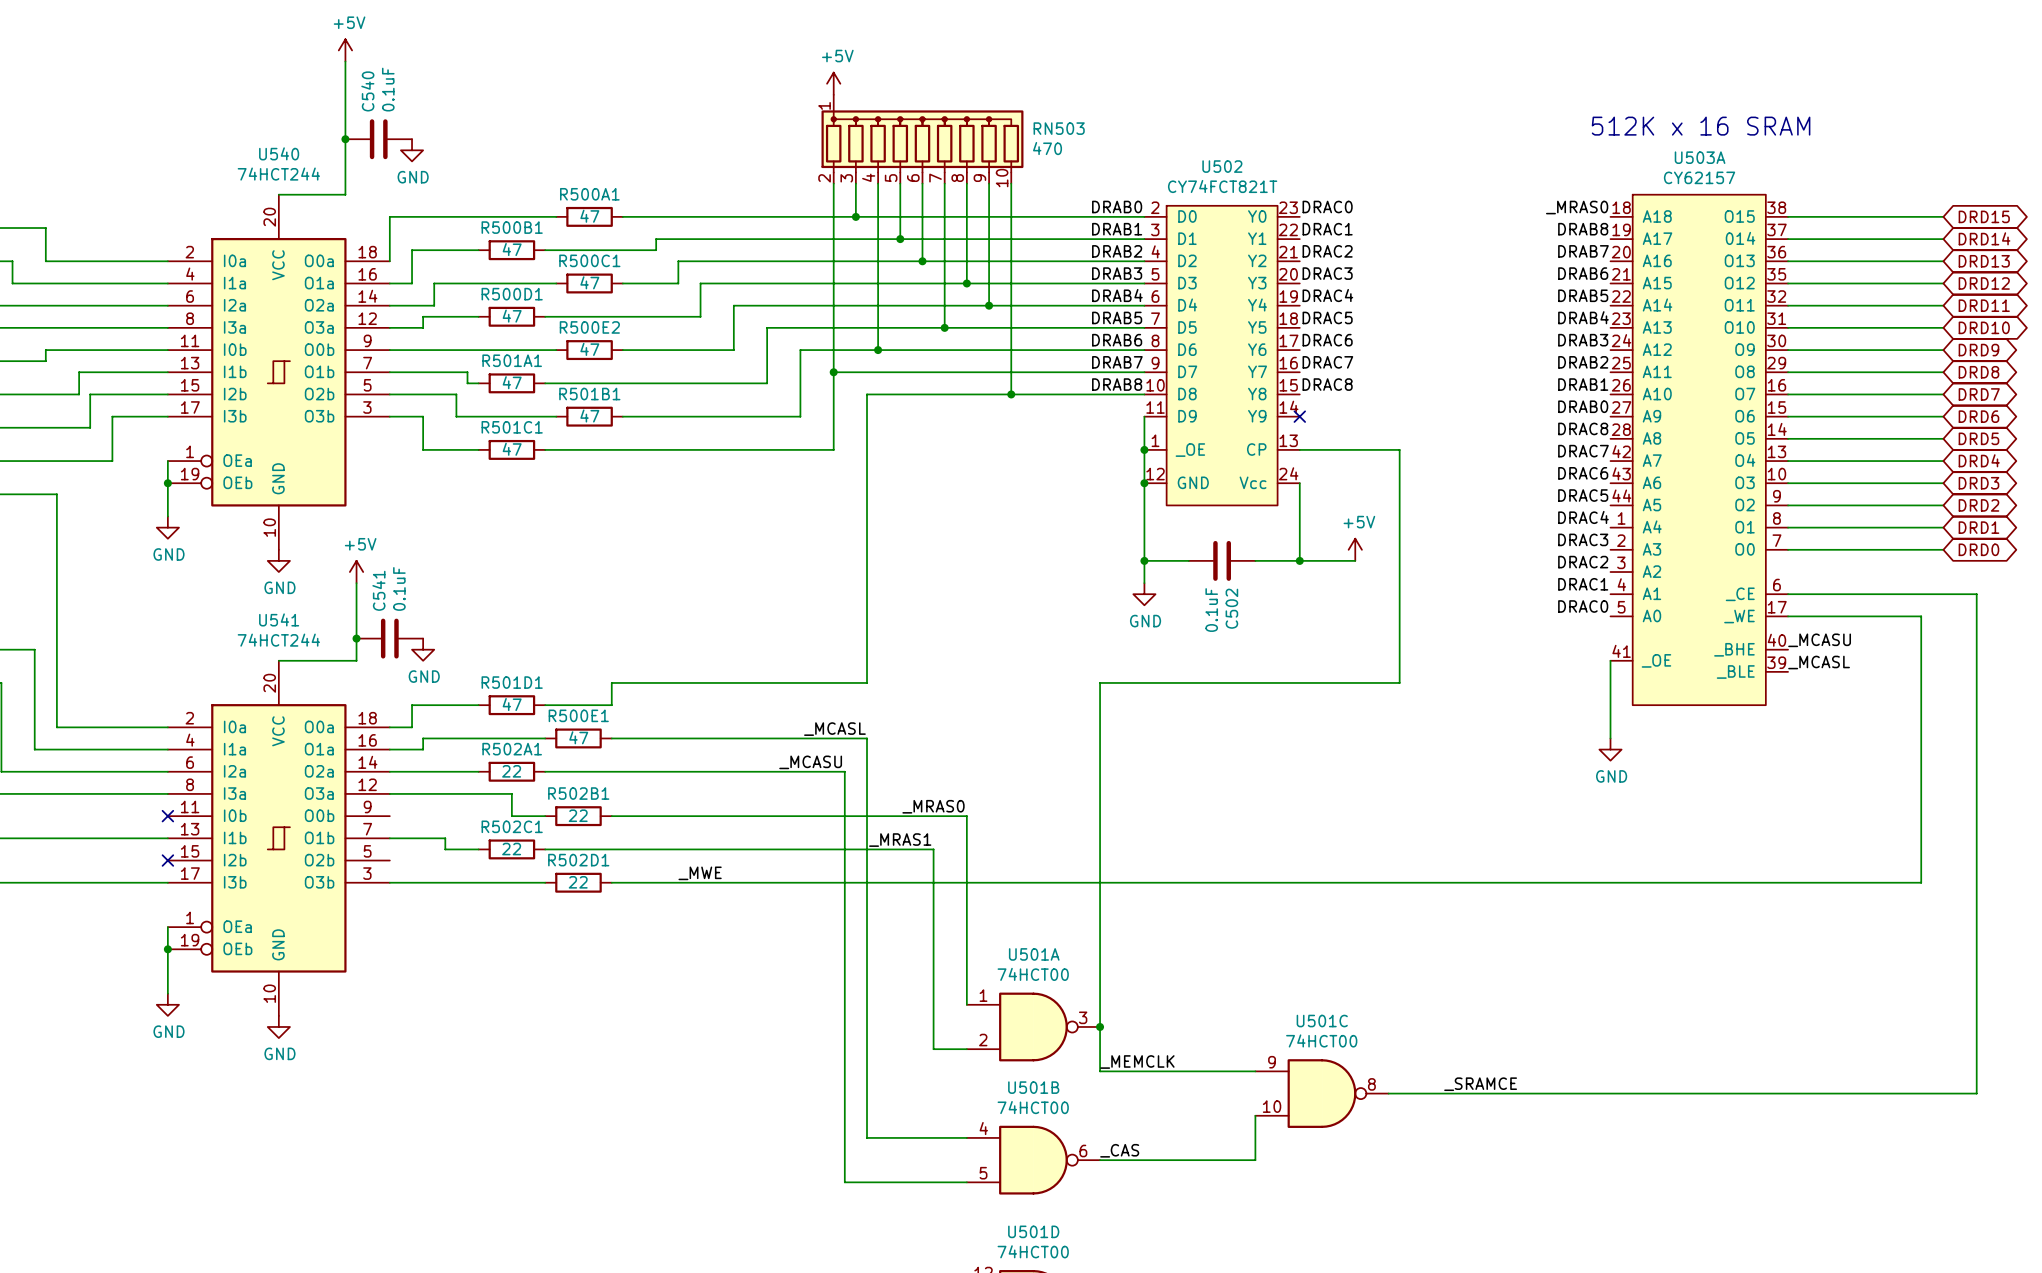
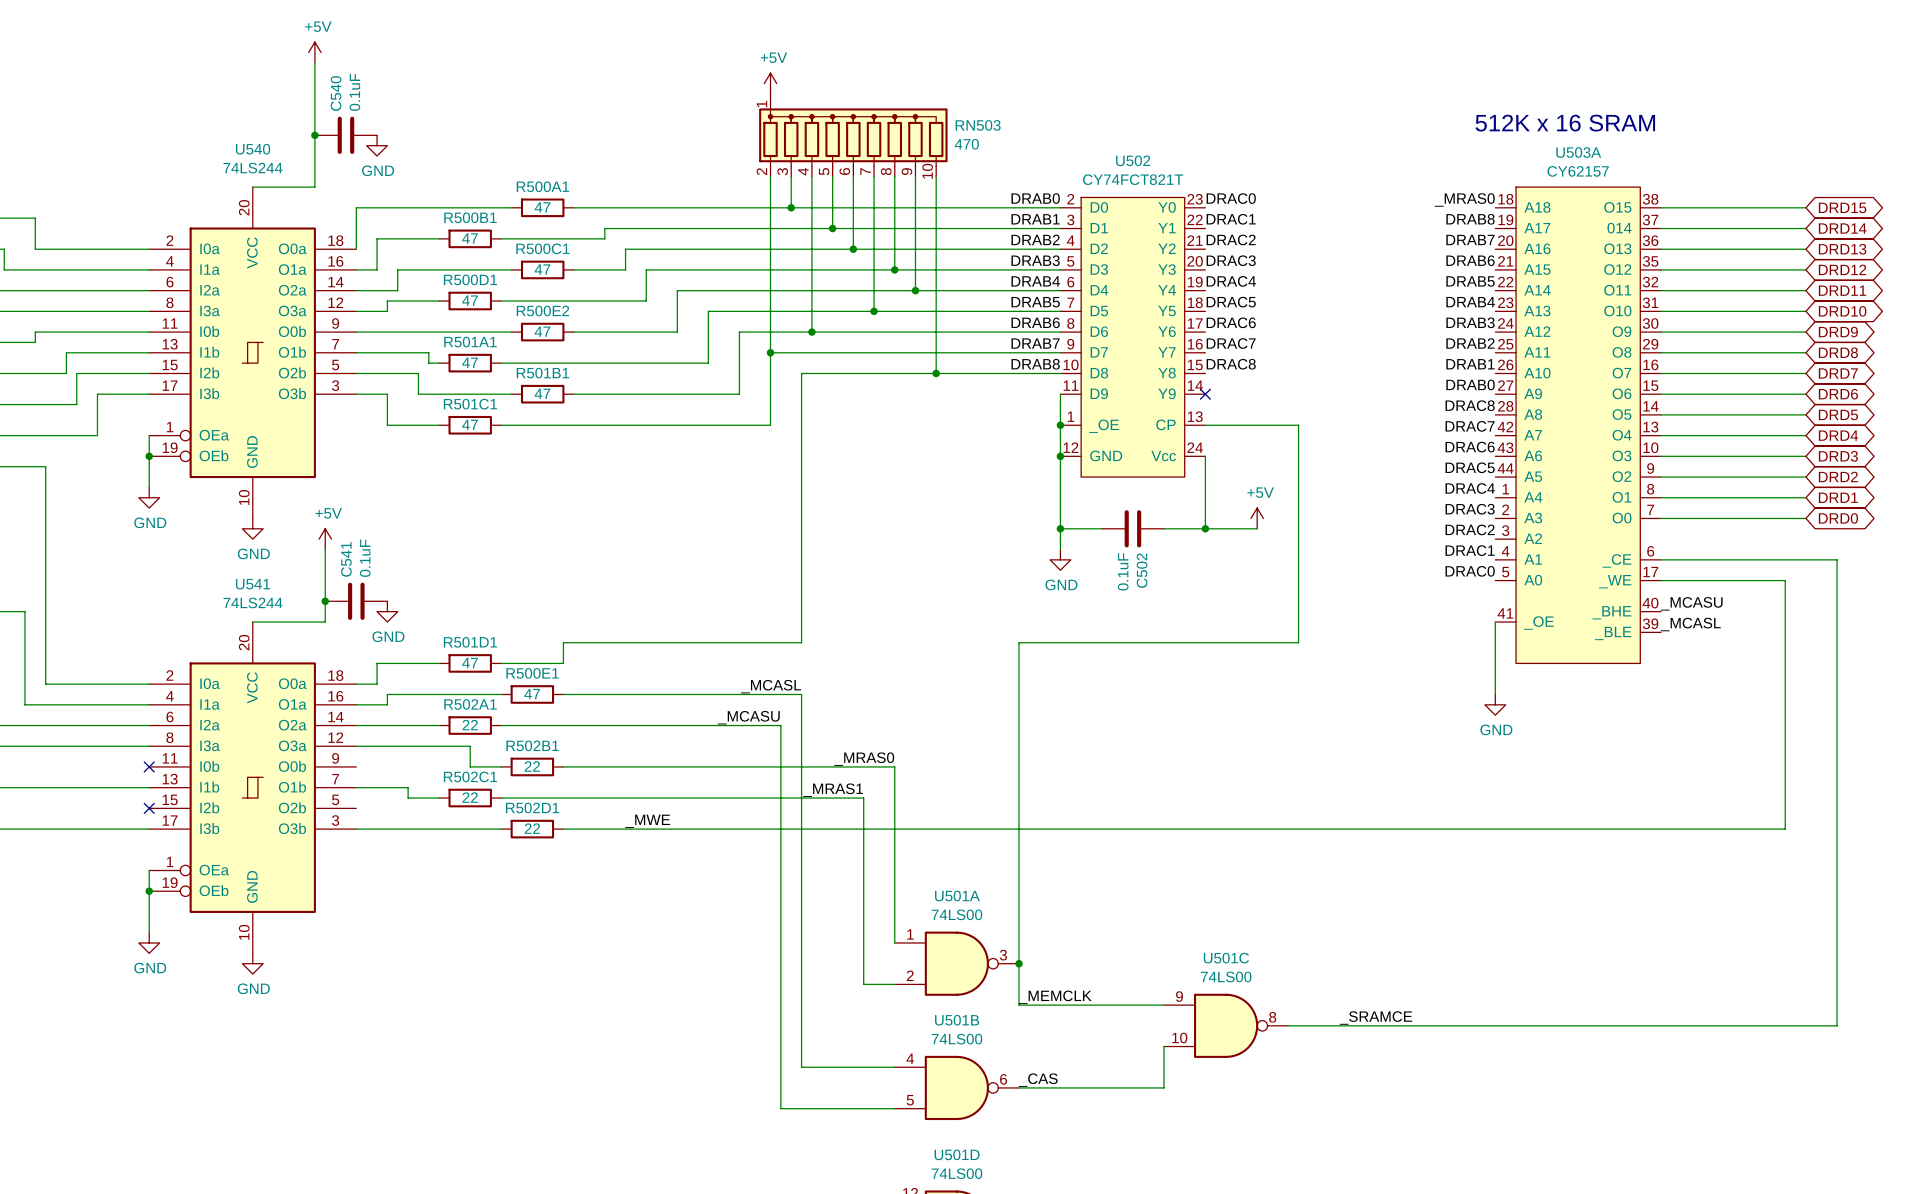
U540 value: 74HCT244 (278, 174) -> 74LS244 (252, 168)
U541 value: 74HCT244 (278, 640) -> 74LS244 (252, 602)
U501A value: 74HCT00 (1033, 974) -> 74LS00 (956, 914)
U501C value: 74HCT00 (1321, 1040) -> 74LS00 (1226, 976)
U501B value: 74HCT00 (1033, 1107) -> 74LS00 (956, 1039)
U501D value: 74HCT00 (1033, 1251) -> 74LS00 (956, 1173)

